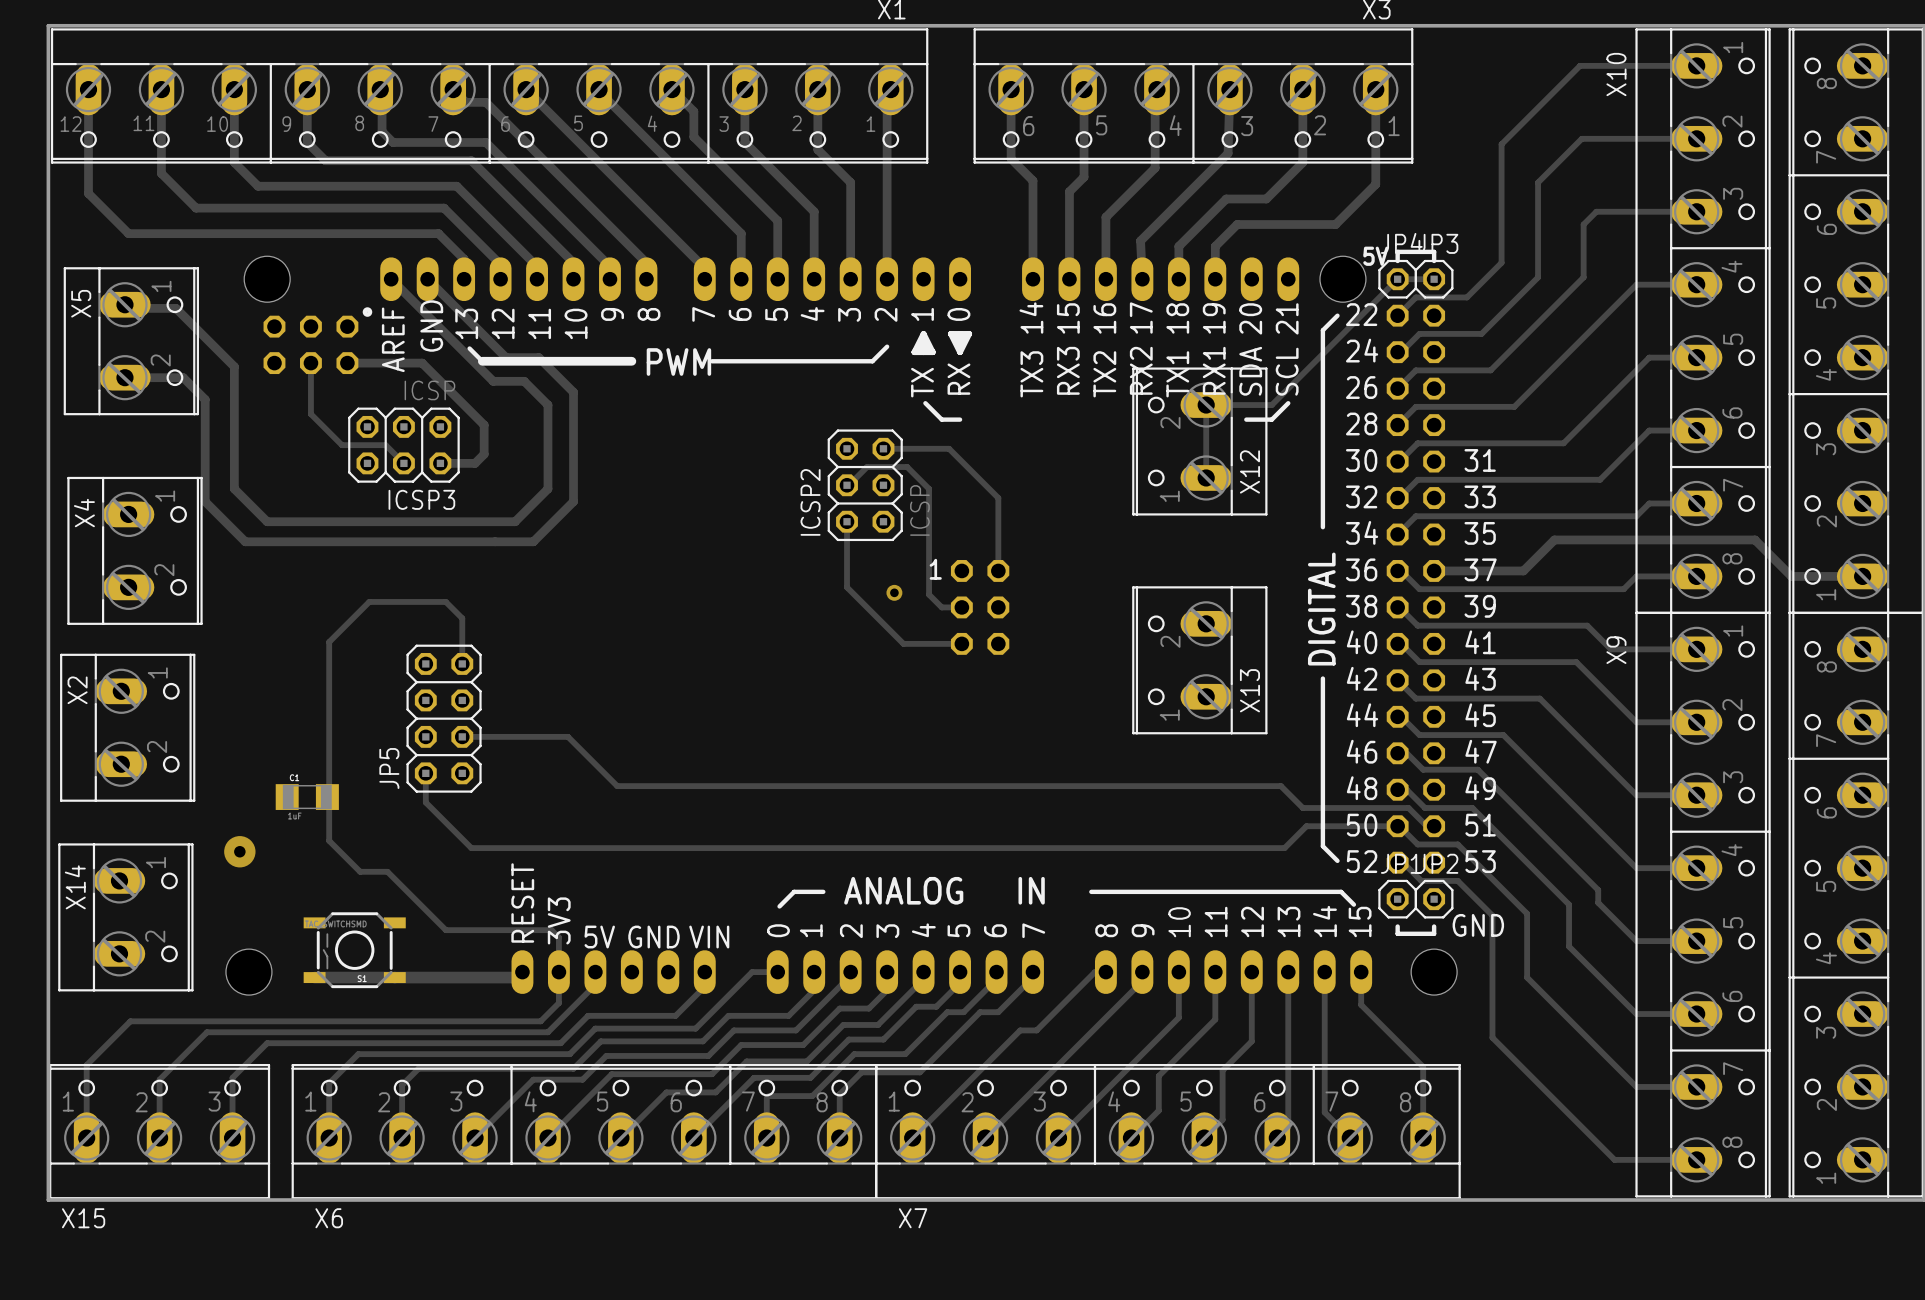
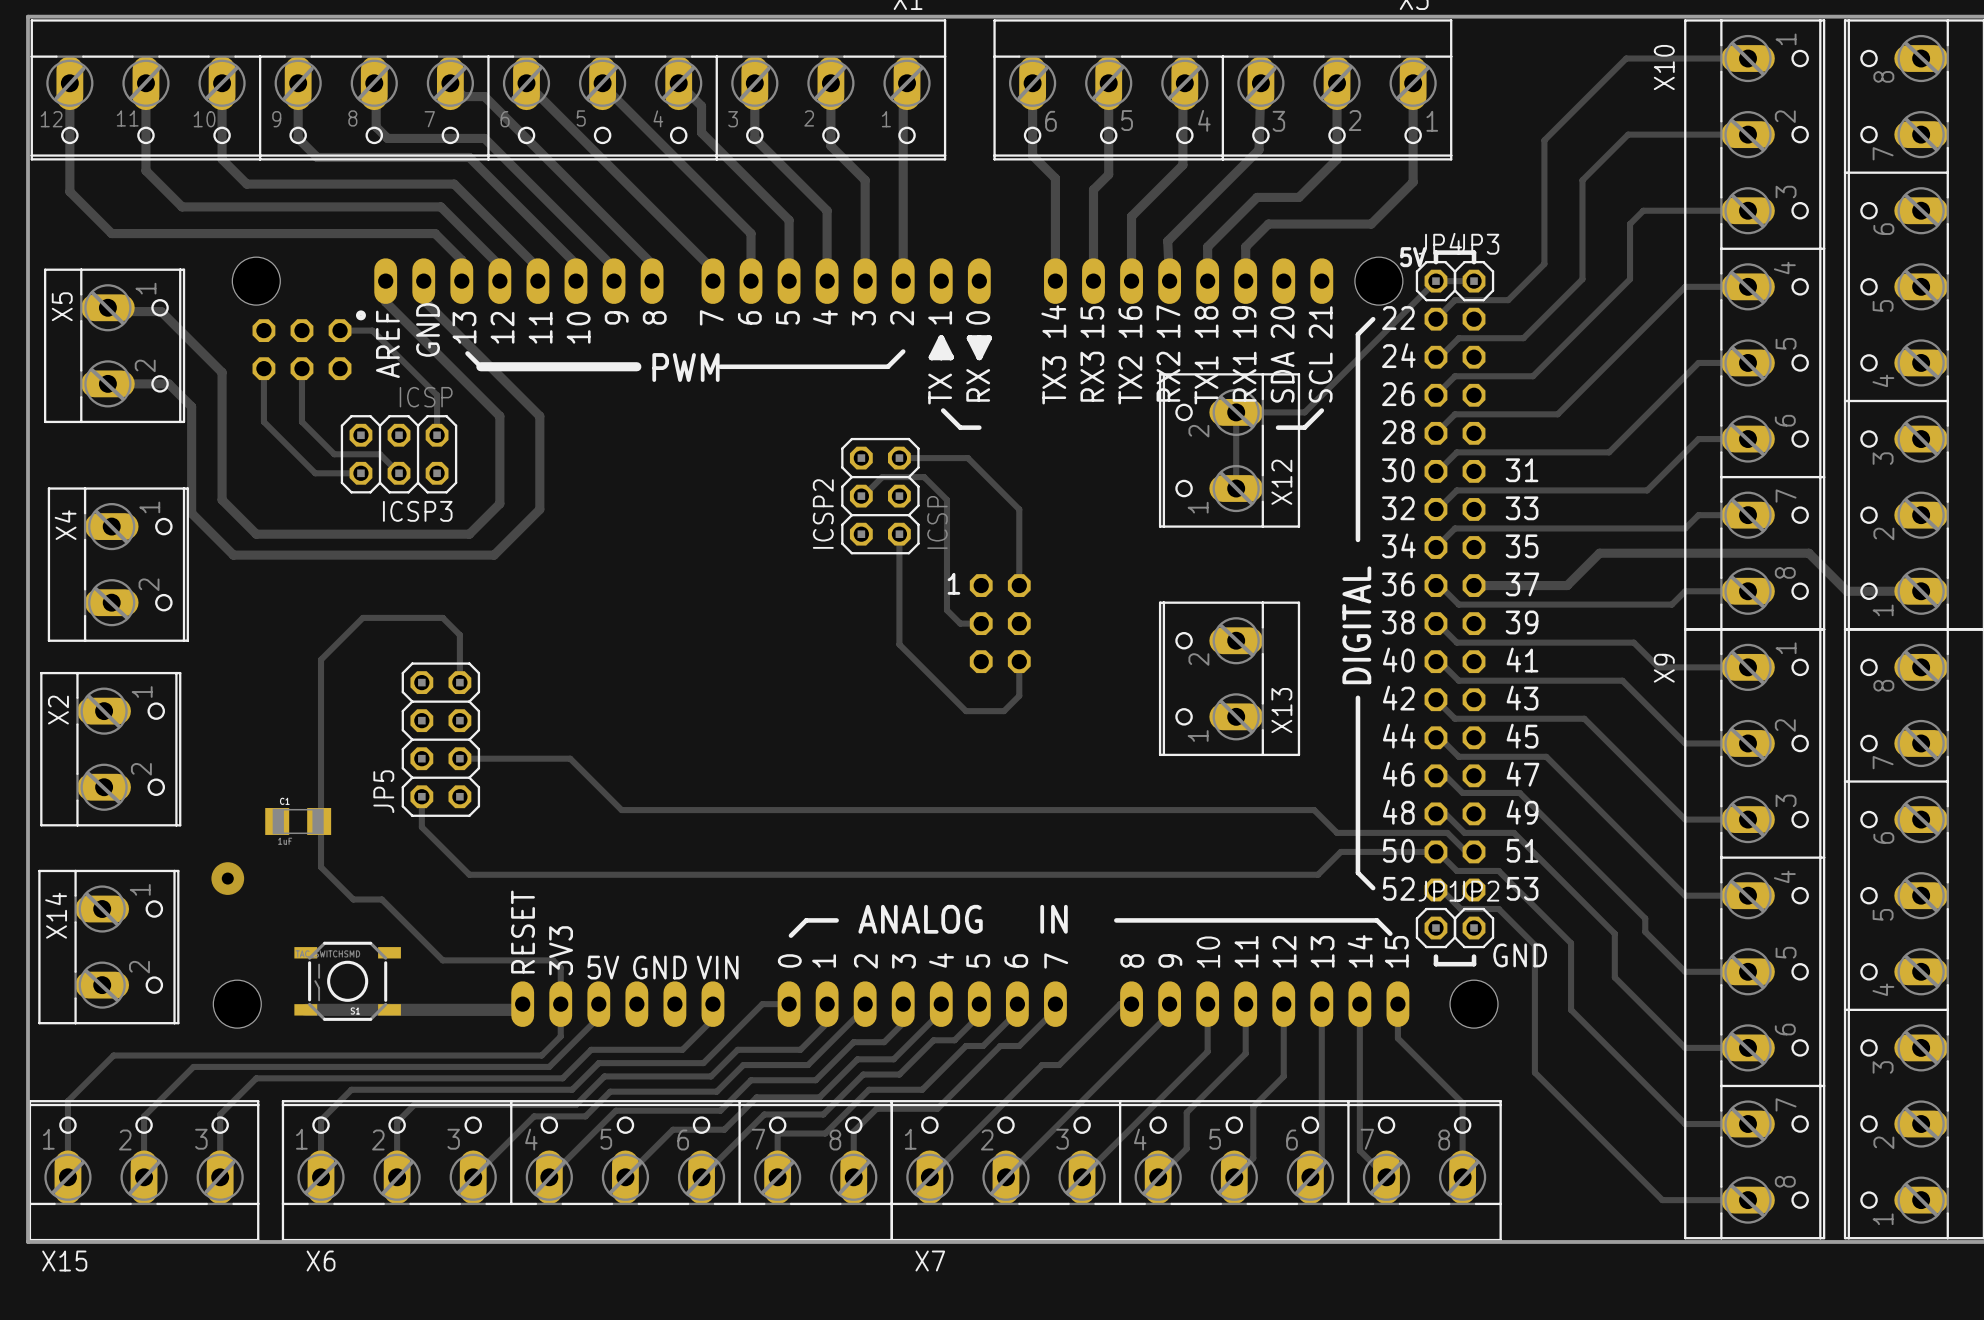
track: (391, 279) (493, 381) (524, 381) (547, 405) (547, 488) (538, 498) -> (423, 281) (423, 300) (539, 416) (539, 509)
track: none -> (385, 281) (385, 302) (499, 416) (499, 503) (469, 534)
track: (427, 279) (506, 357) (538, 357) (573, 392) (573, 501) (533, 541) (495, 541) -> none
track: none -> (340, 330) (372, 330) (437, 395) (437, 435)
track: none -> (263, 368) (263, 421) (315, 473) (360, 473)
track: (347, 363) (422, 363) (484, 425) (484, 454) (475, 463) (440, 463) -> none
track: (471, 521) (515, 521) -> (494, 555) (515, 534)
track: (847, 521) (847, 587) (903, 643) (961, 643) -> none
track: none -> (899, 534) (899, 644) (966, 711) (1004, 711) (1019, 695) (1019, 661)
via: (894, 592) -> none

